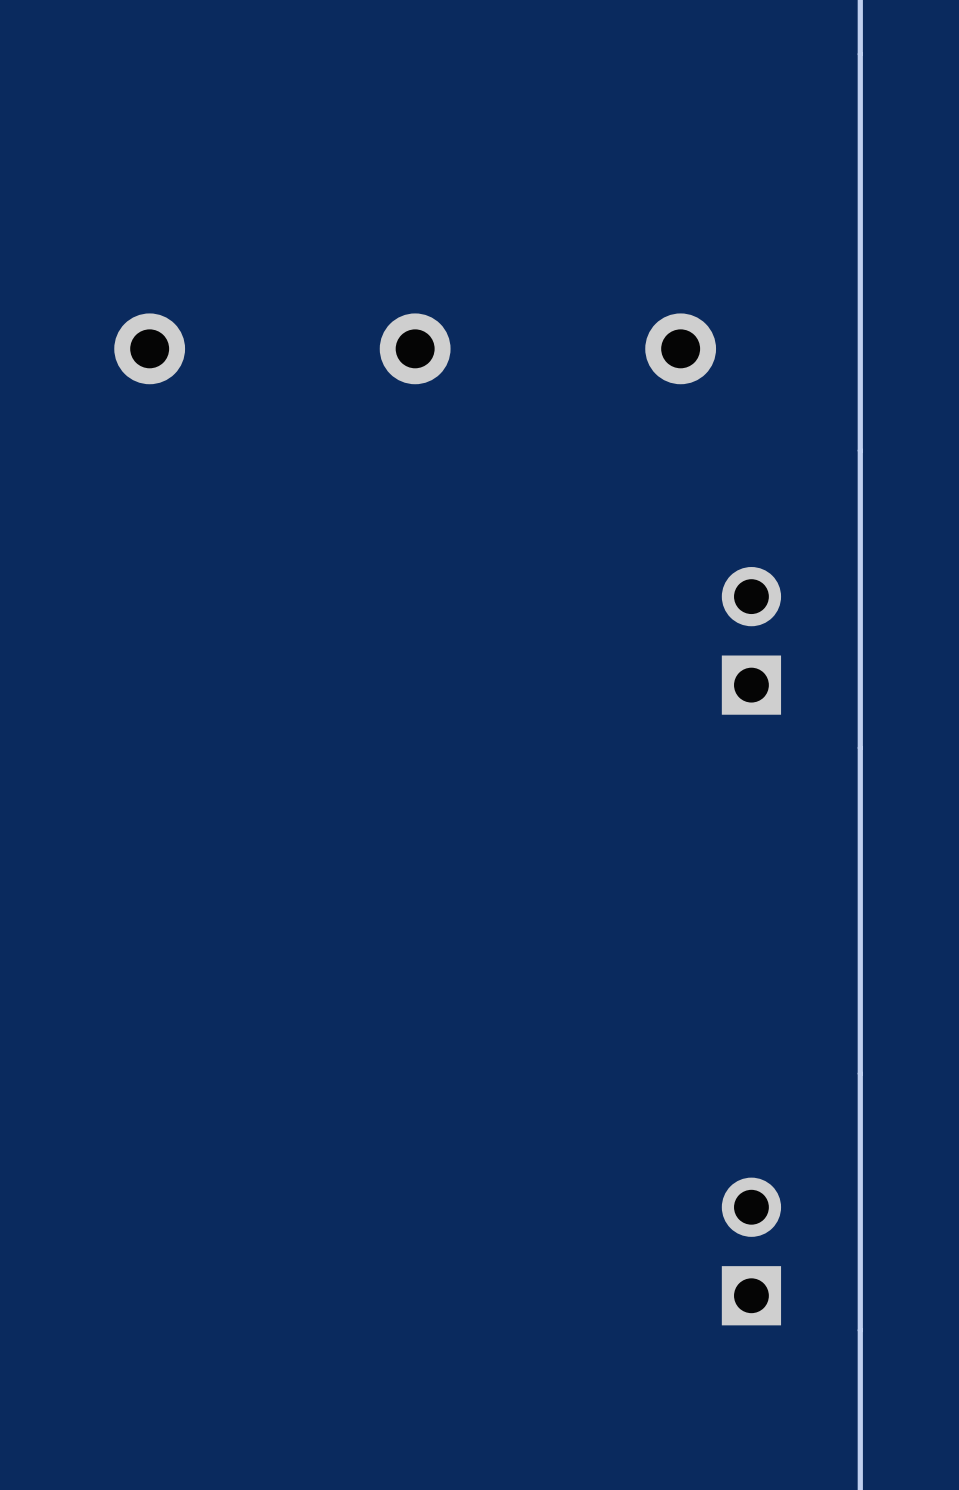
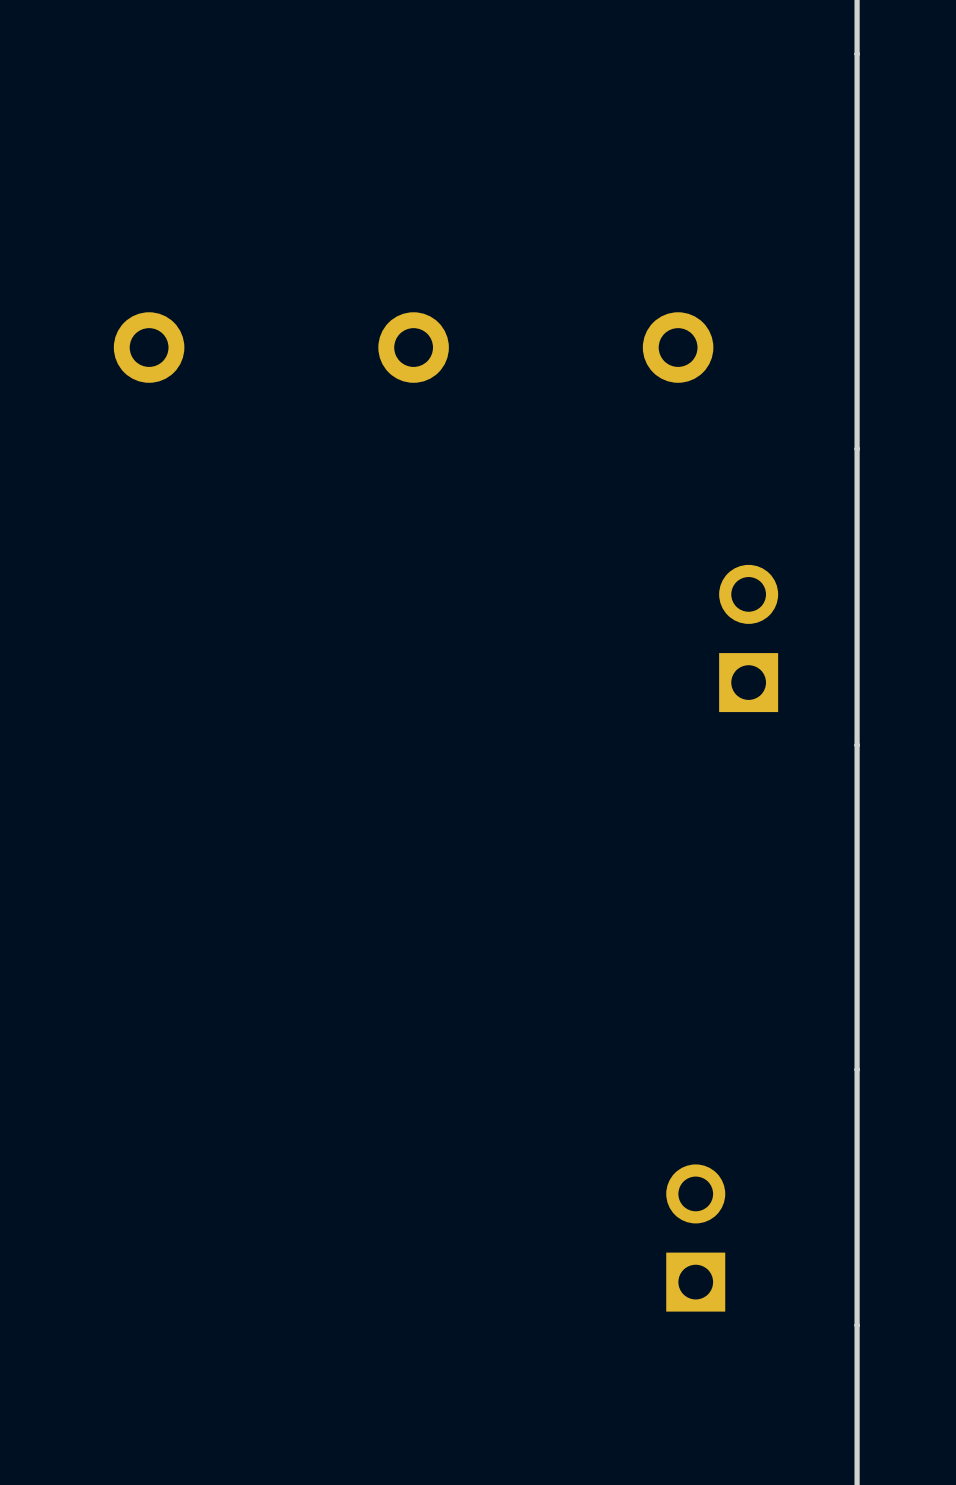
part position: (751, 1251) -> (695, 1238)

